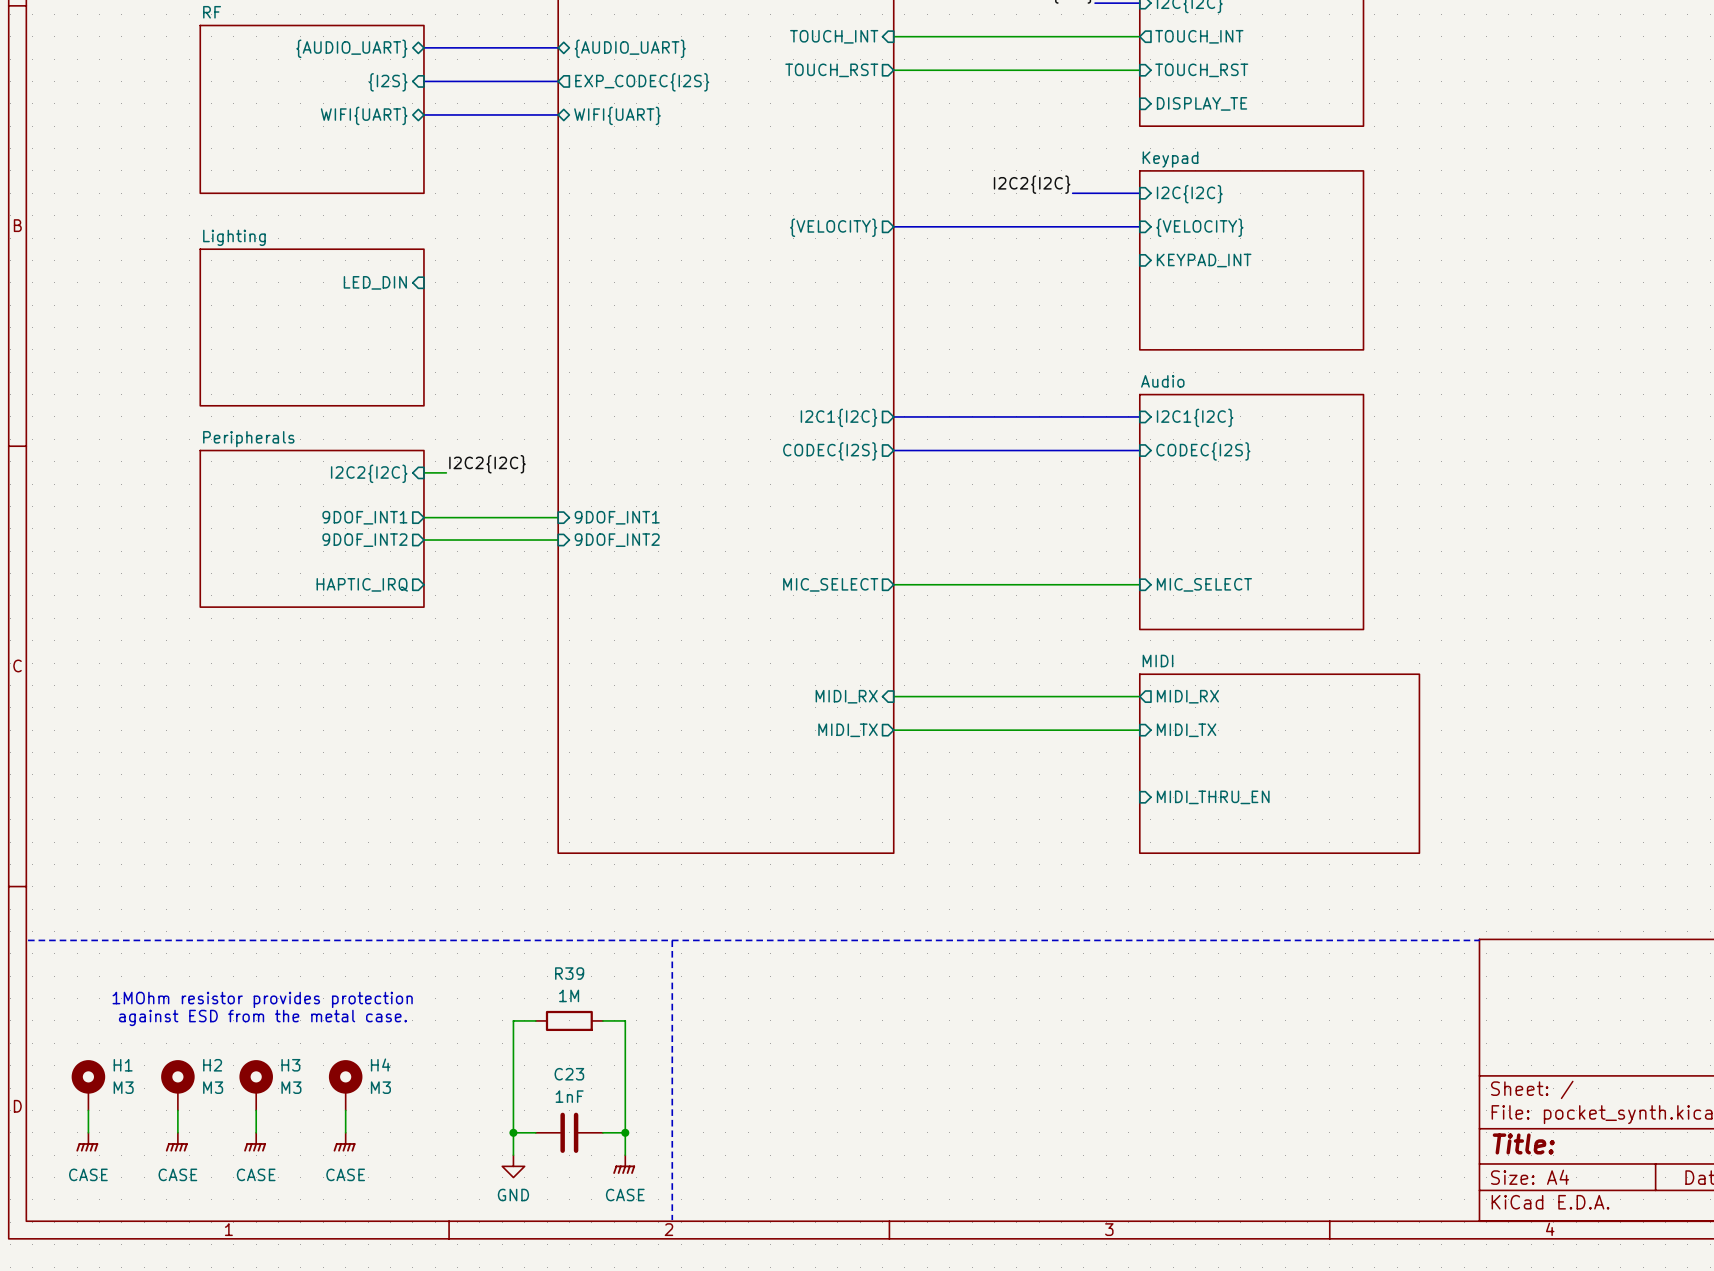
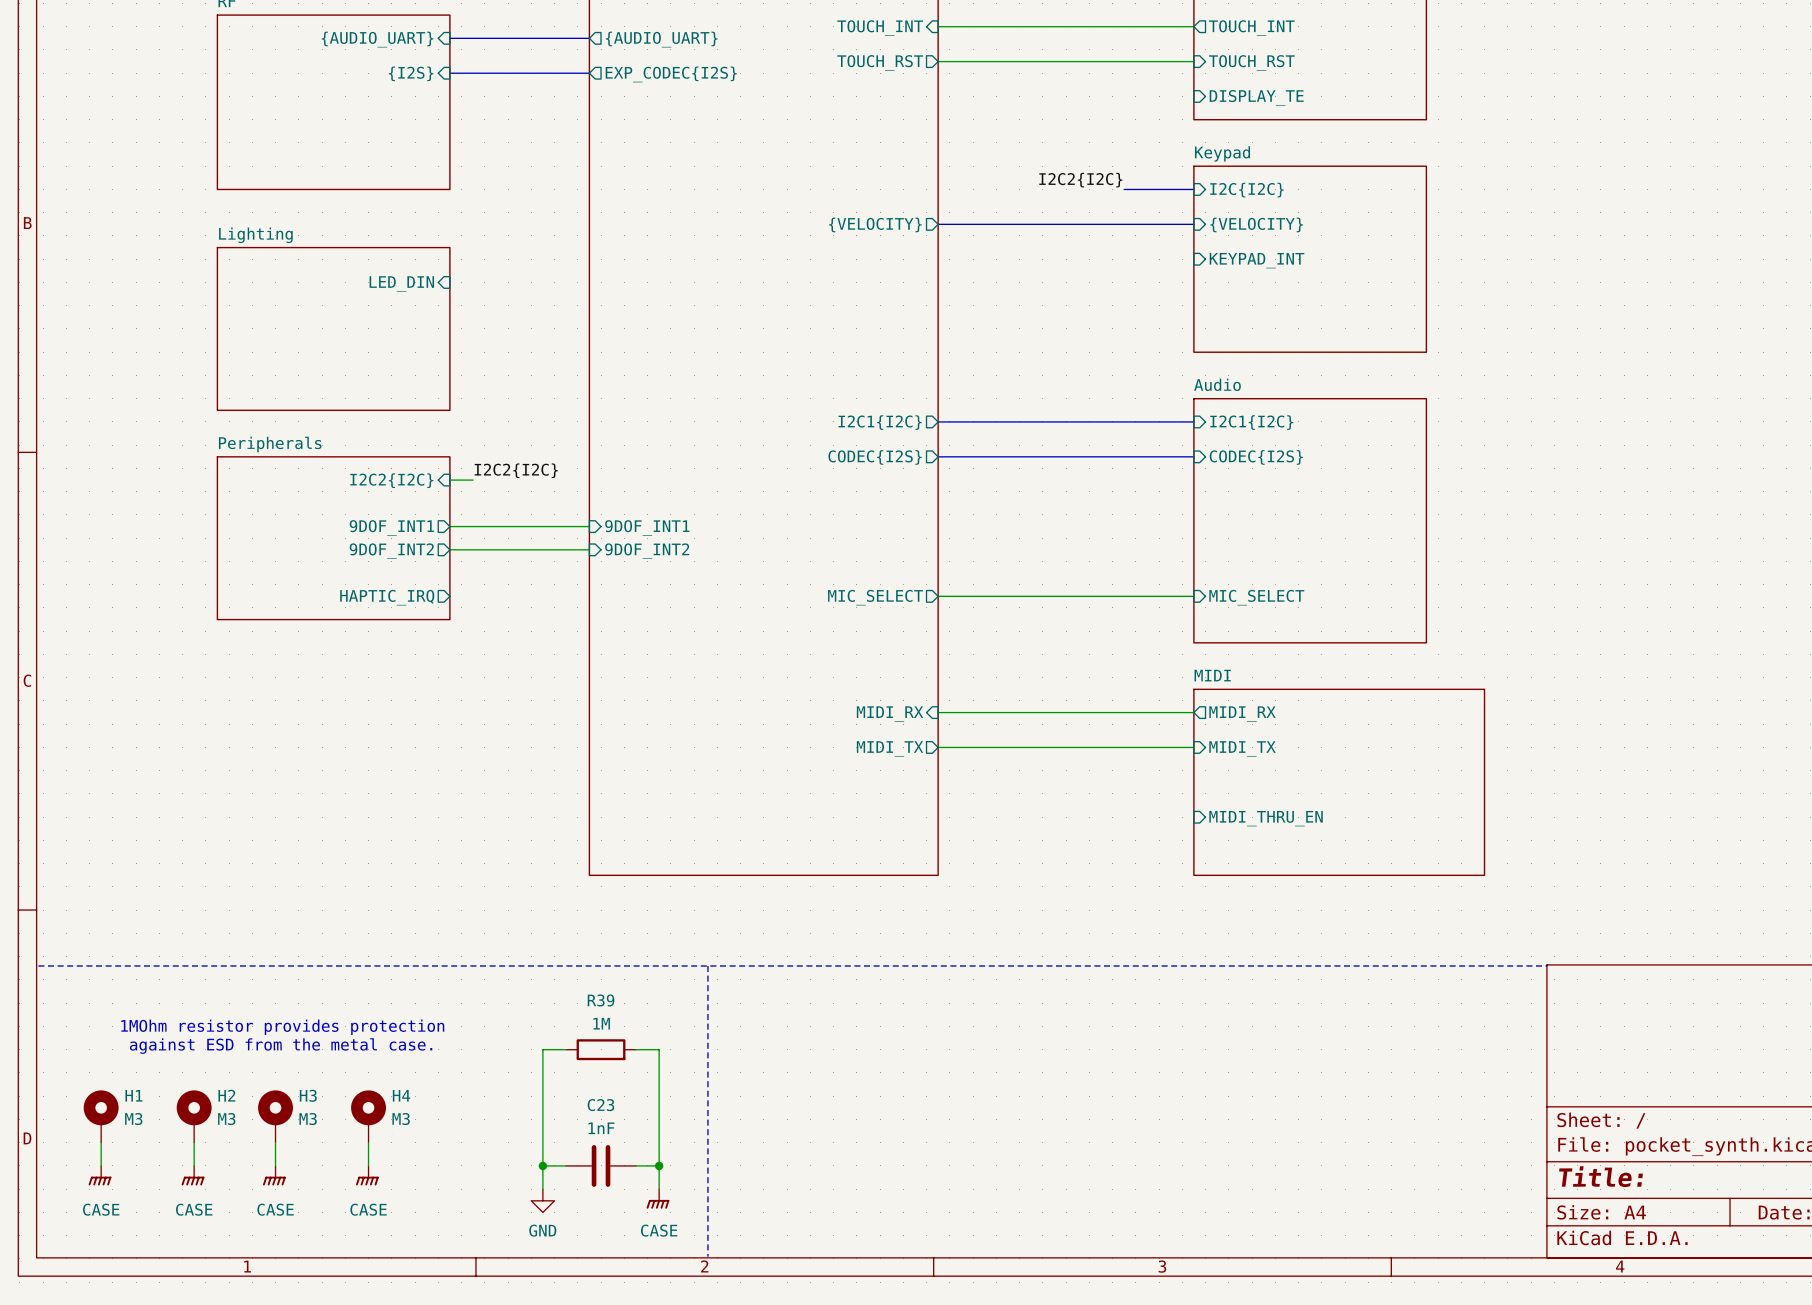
sheet pin shape: bidirectional (351, 48) -> input (377, 39)
sheet pin shape: bidirectional (630, 48) -> output (661, 39)
bus: (423, 114) (558, 114) -> none
sheet pin: WIFI{UART} (364, 115) -> none
sheet pin: WIFI{UART} (617, 115) -> none

